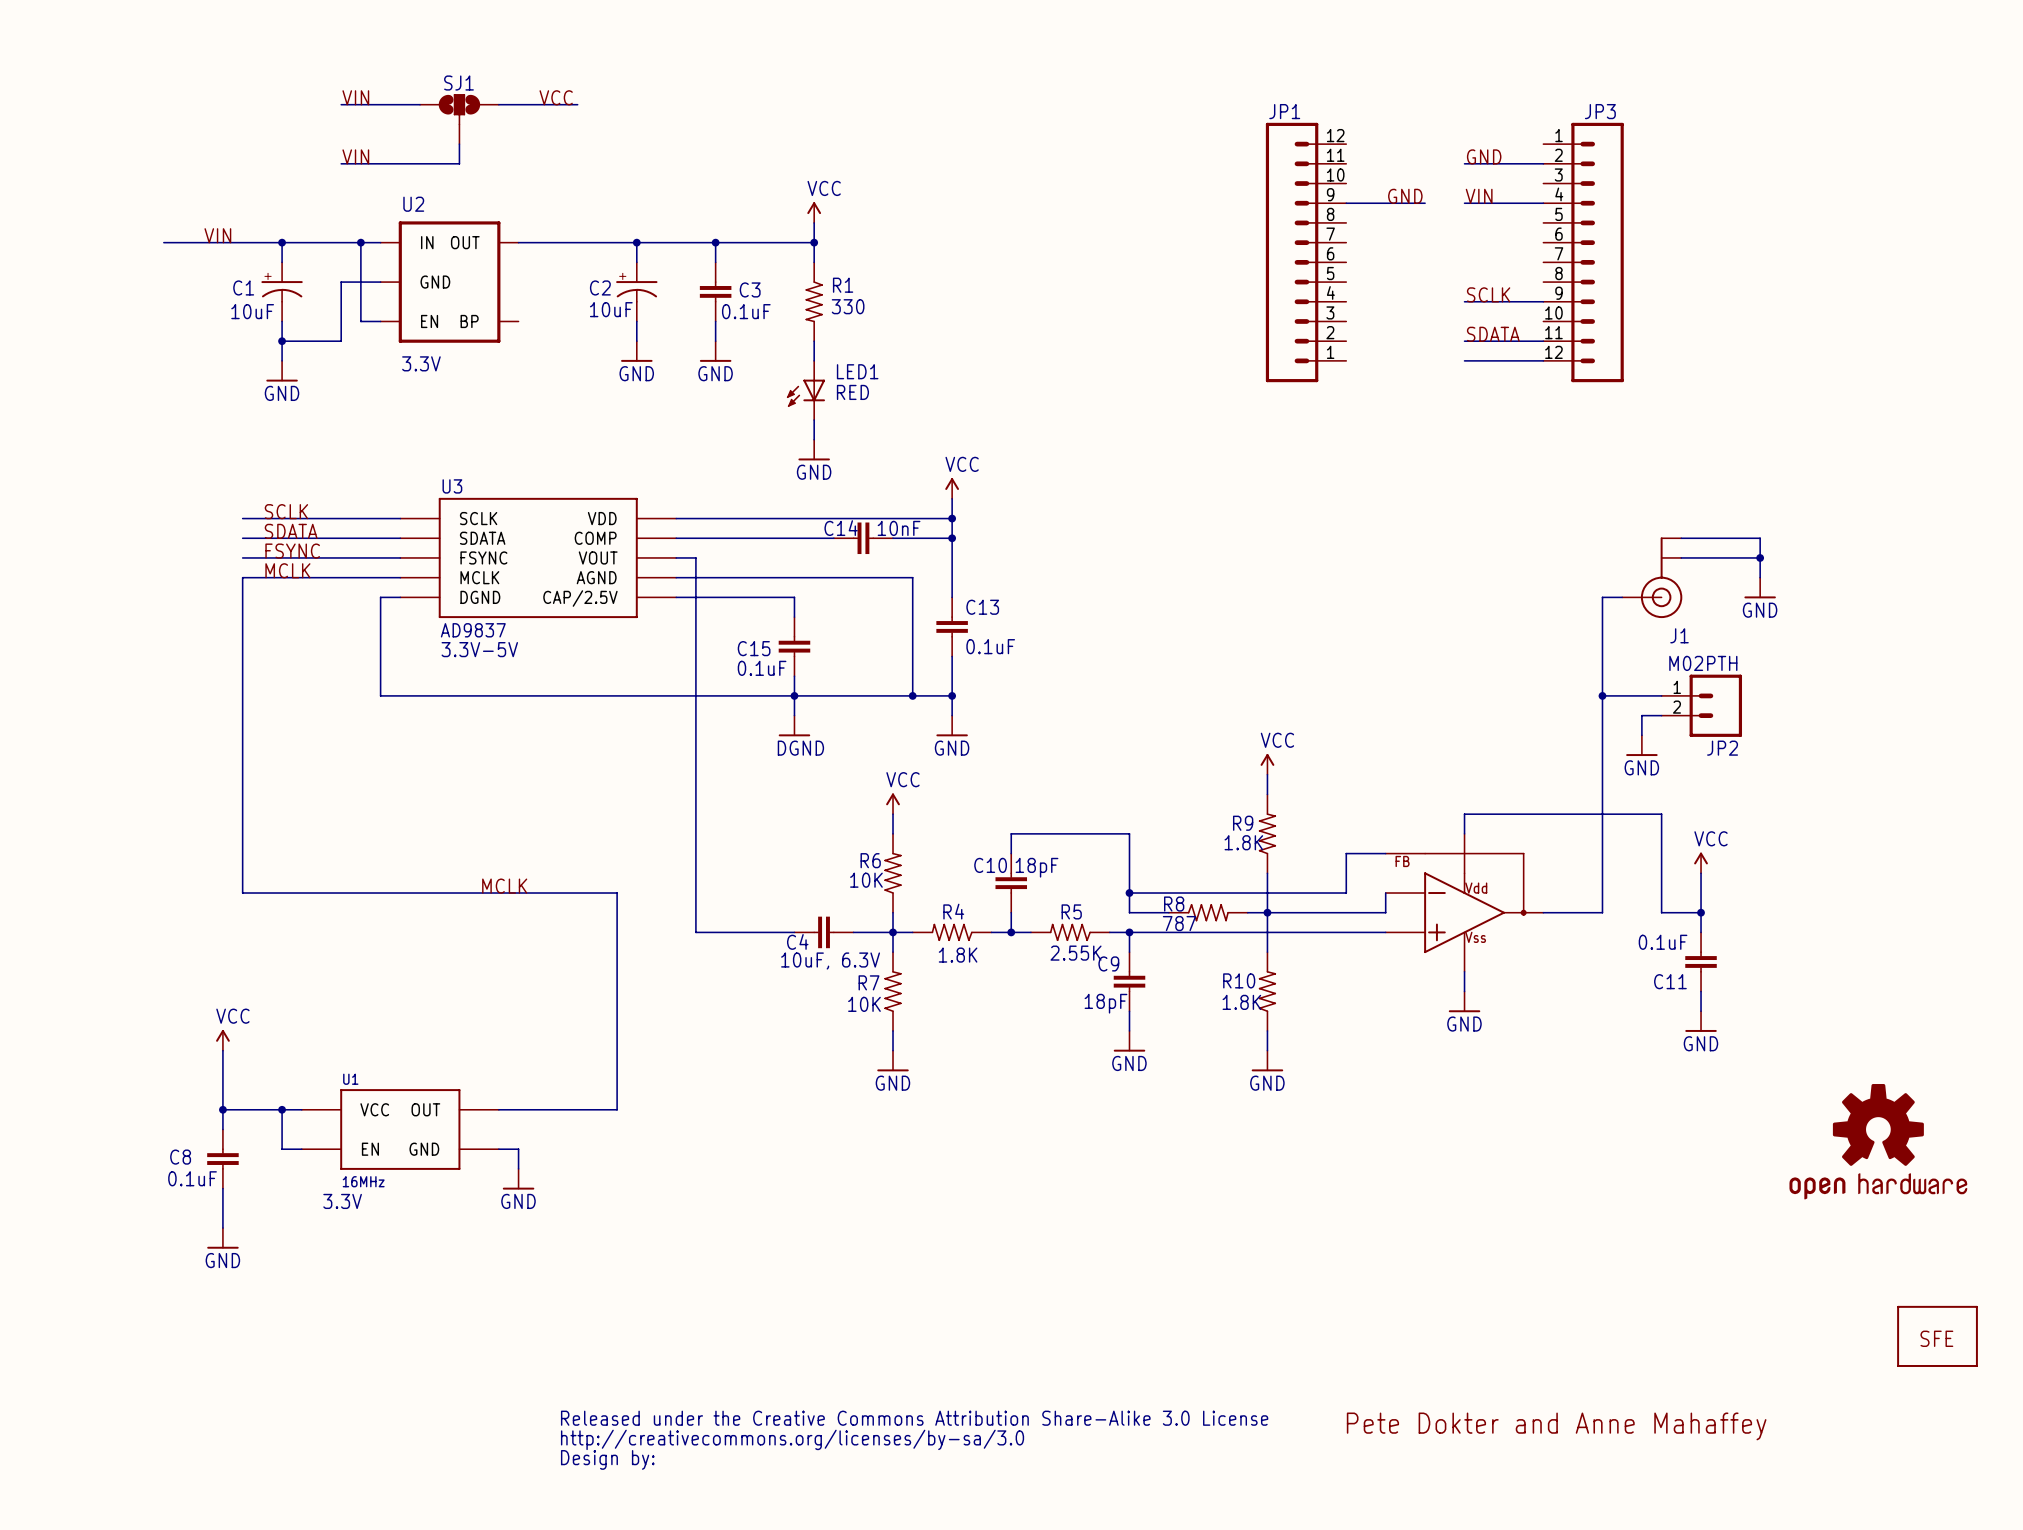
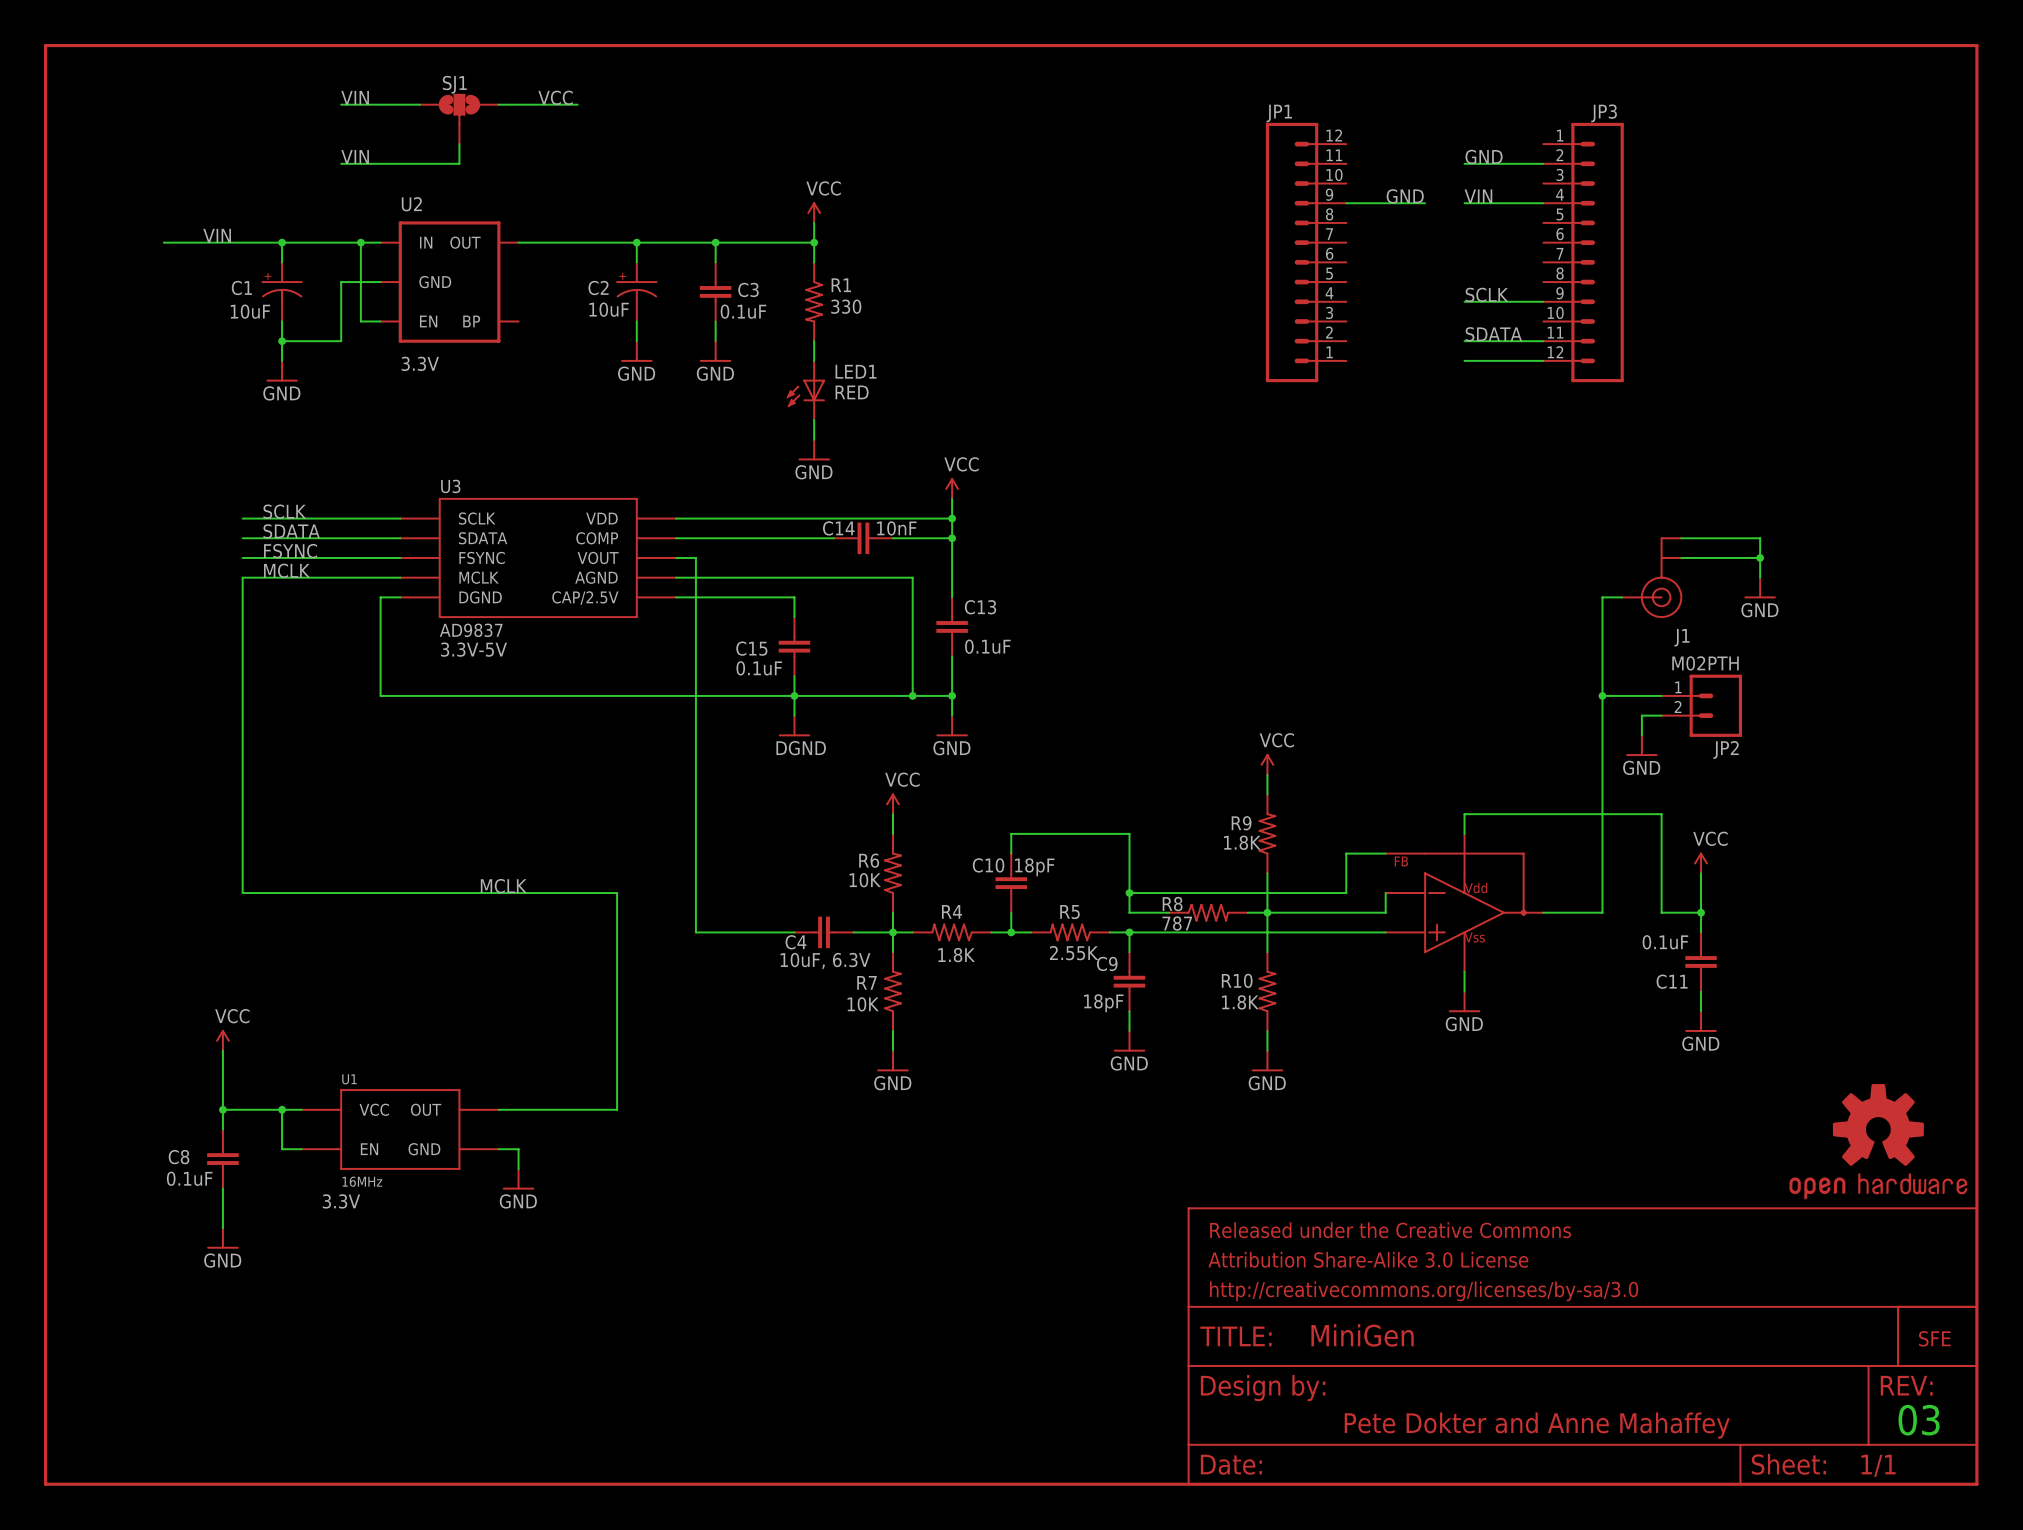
part: none -> (1011, 764)
part: none -> (1582, 1346)
text: none -> 03 (1919, 1420)
part: (914, 1440) -> none

